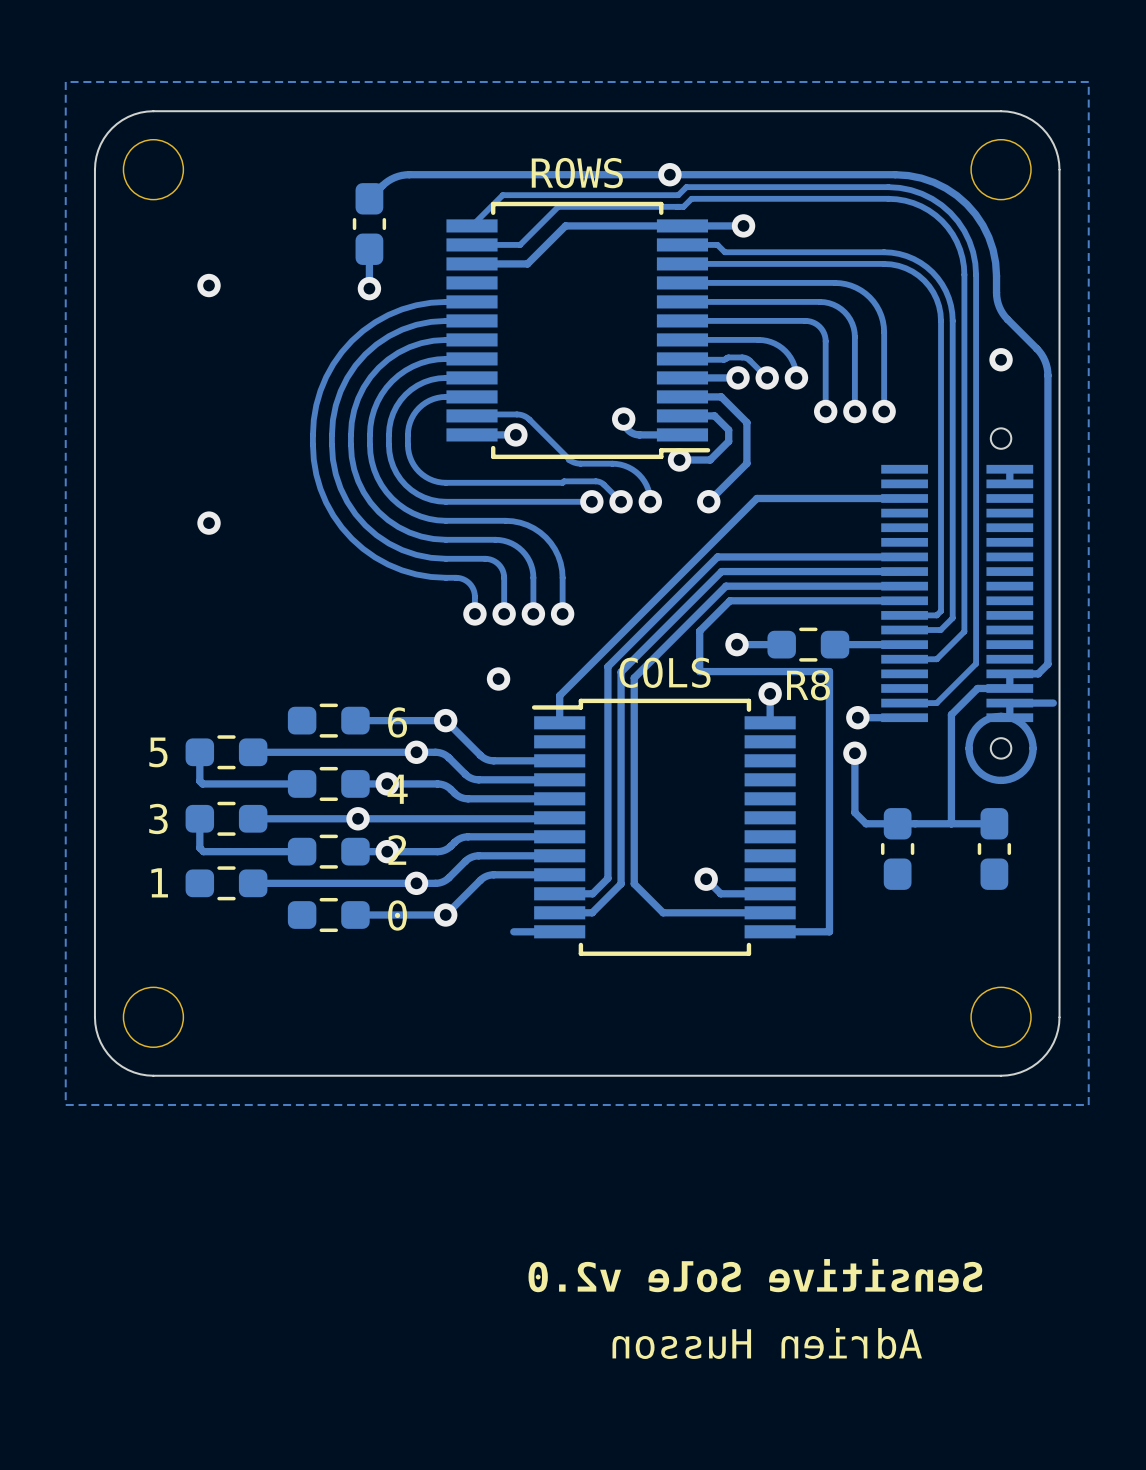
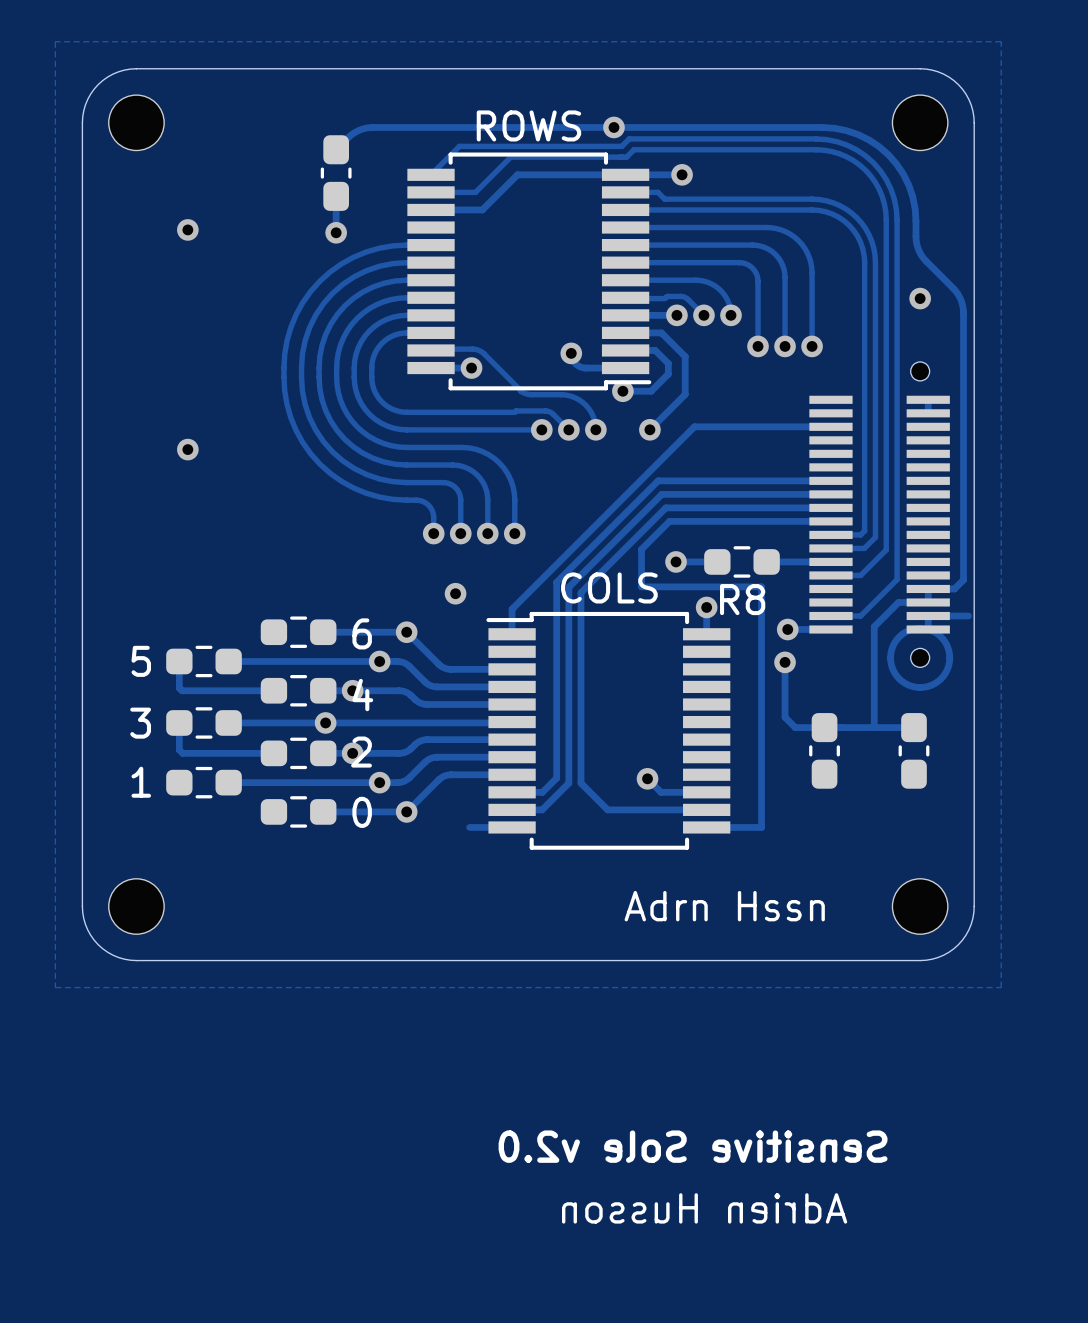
text: none -> Adrn Hssn (724, 906)

